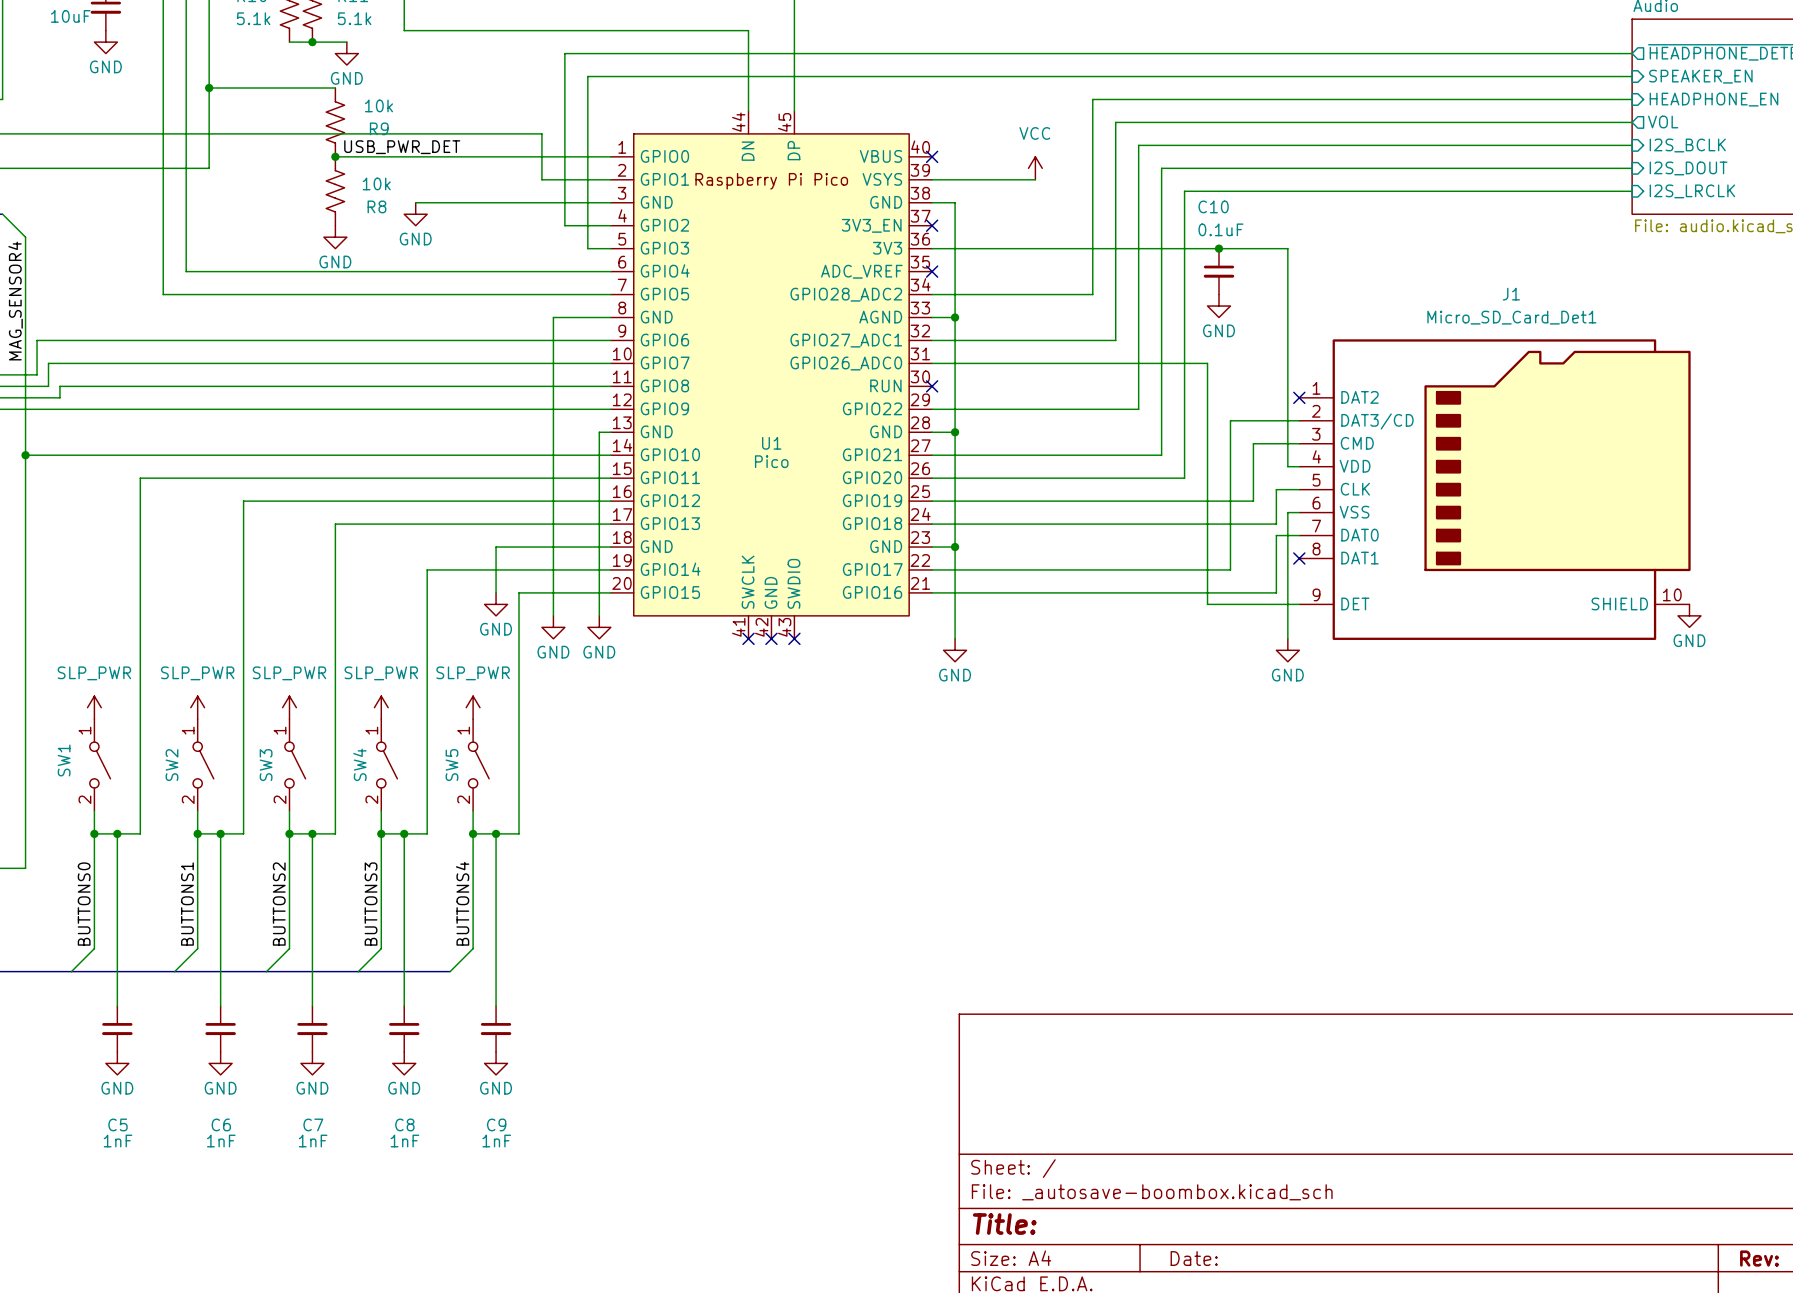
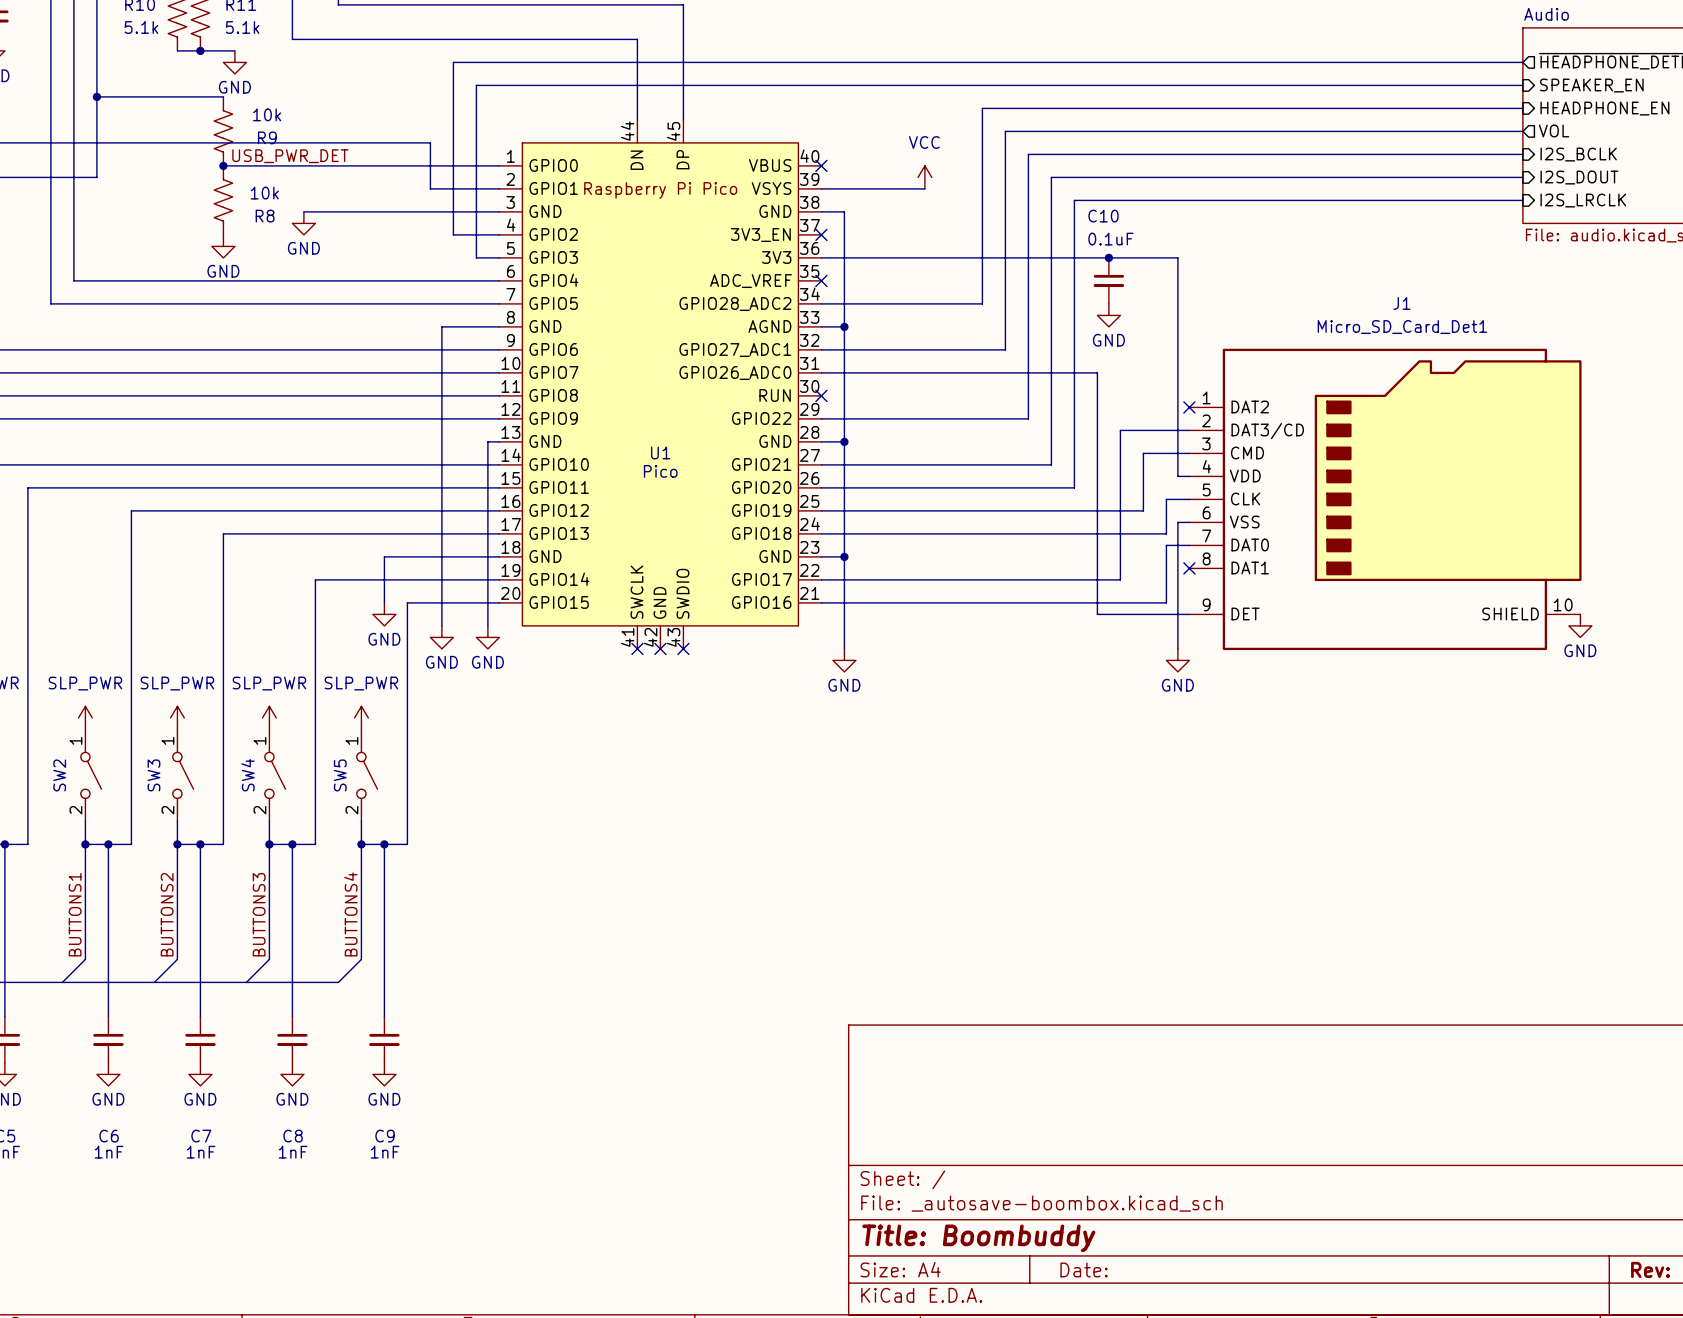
title block: Title: (1004, 1224) -> Title: Boombuddy (978, 1238)

